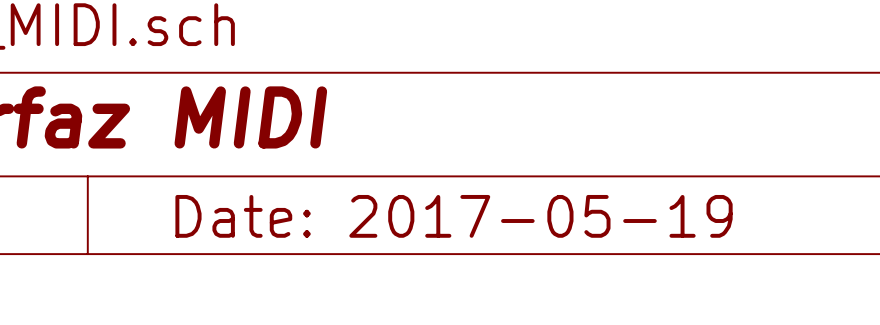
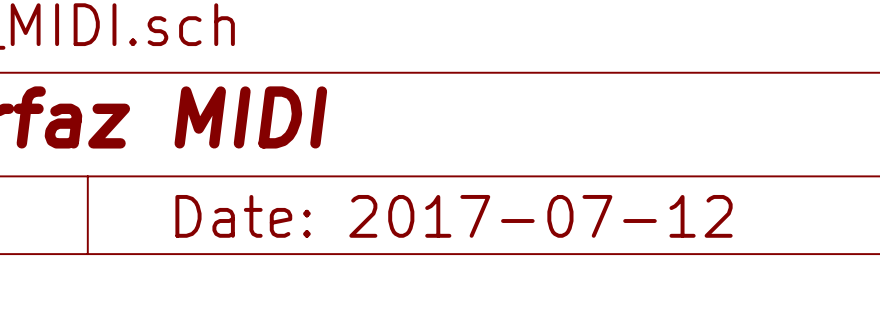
title block: Date: 2017-05-19 (454, 216) -> Date: 2017-07-12 (454, 216)

